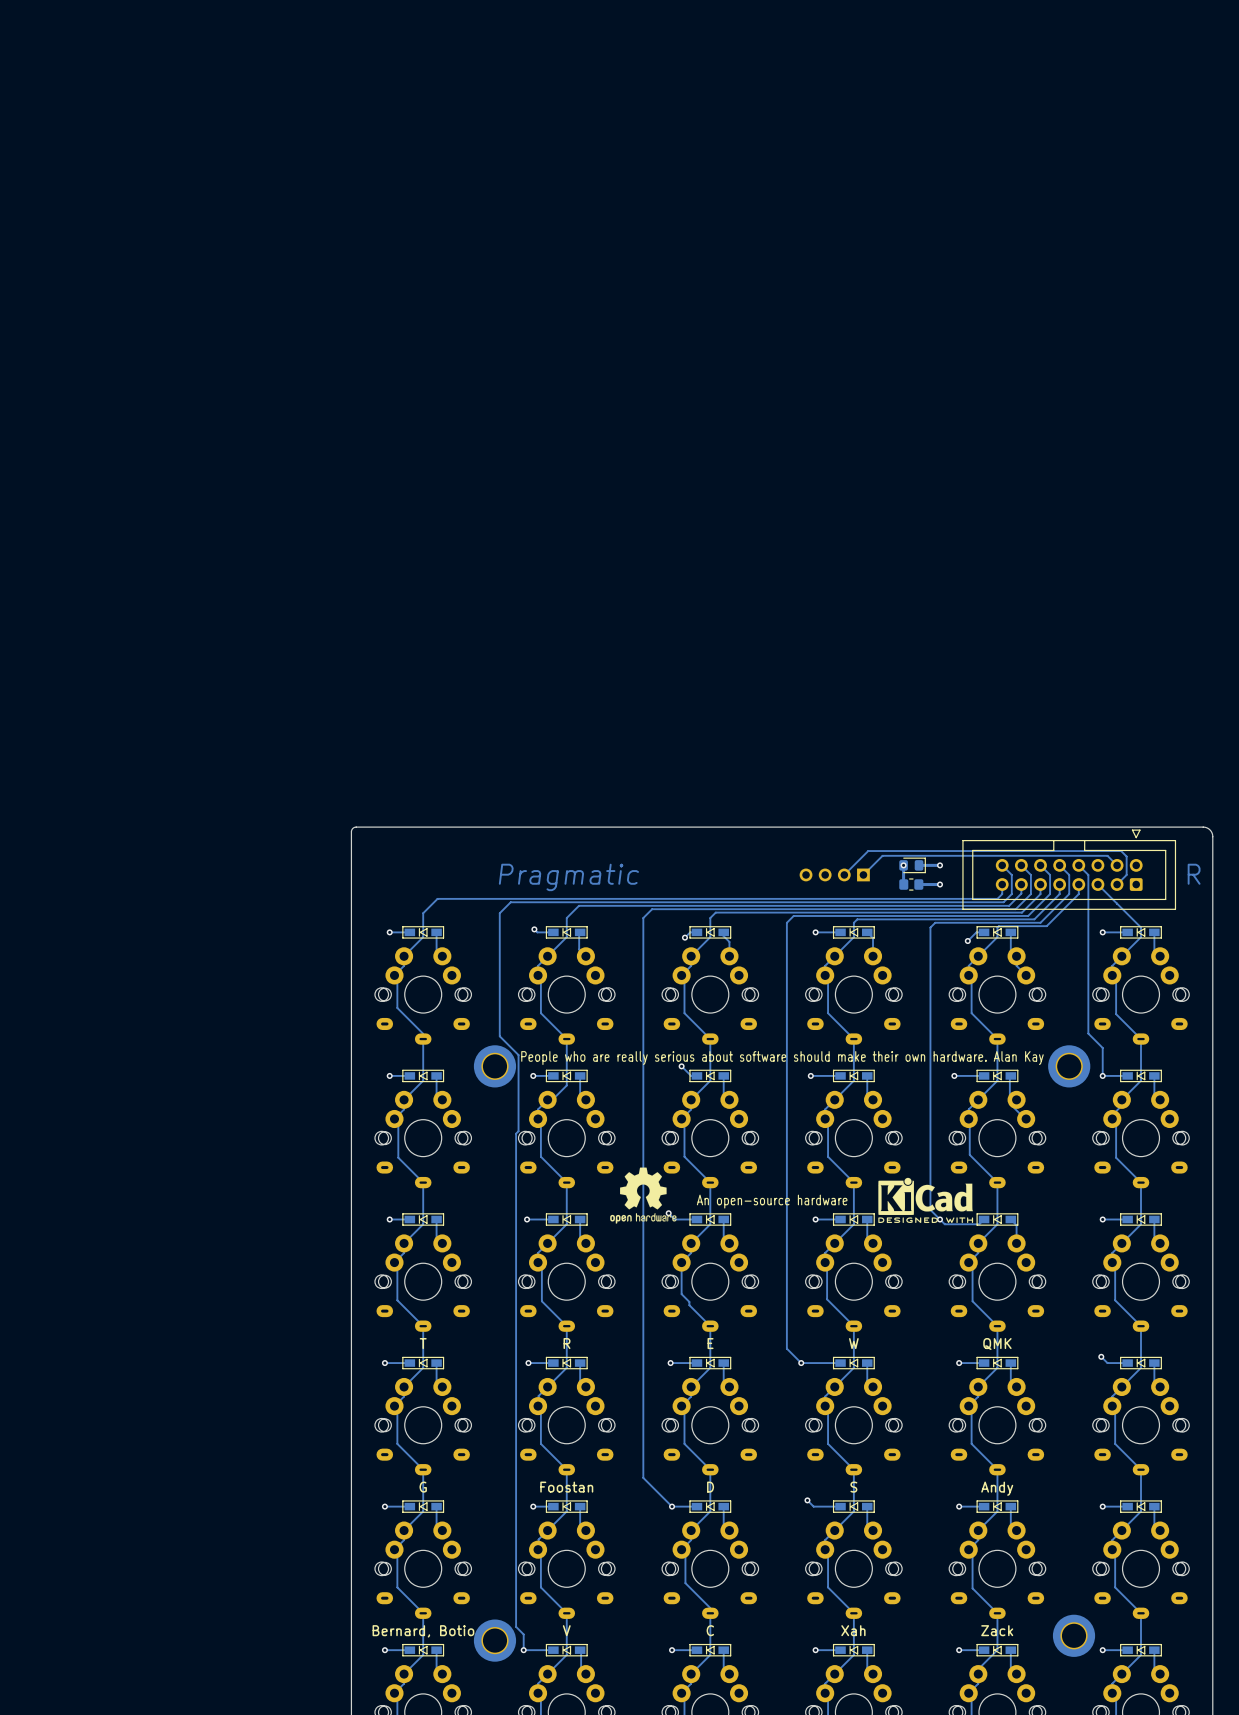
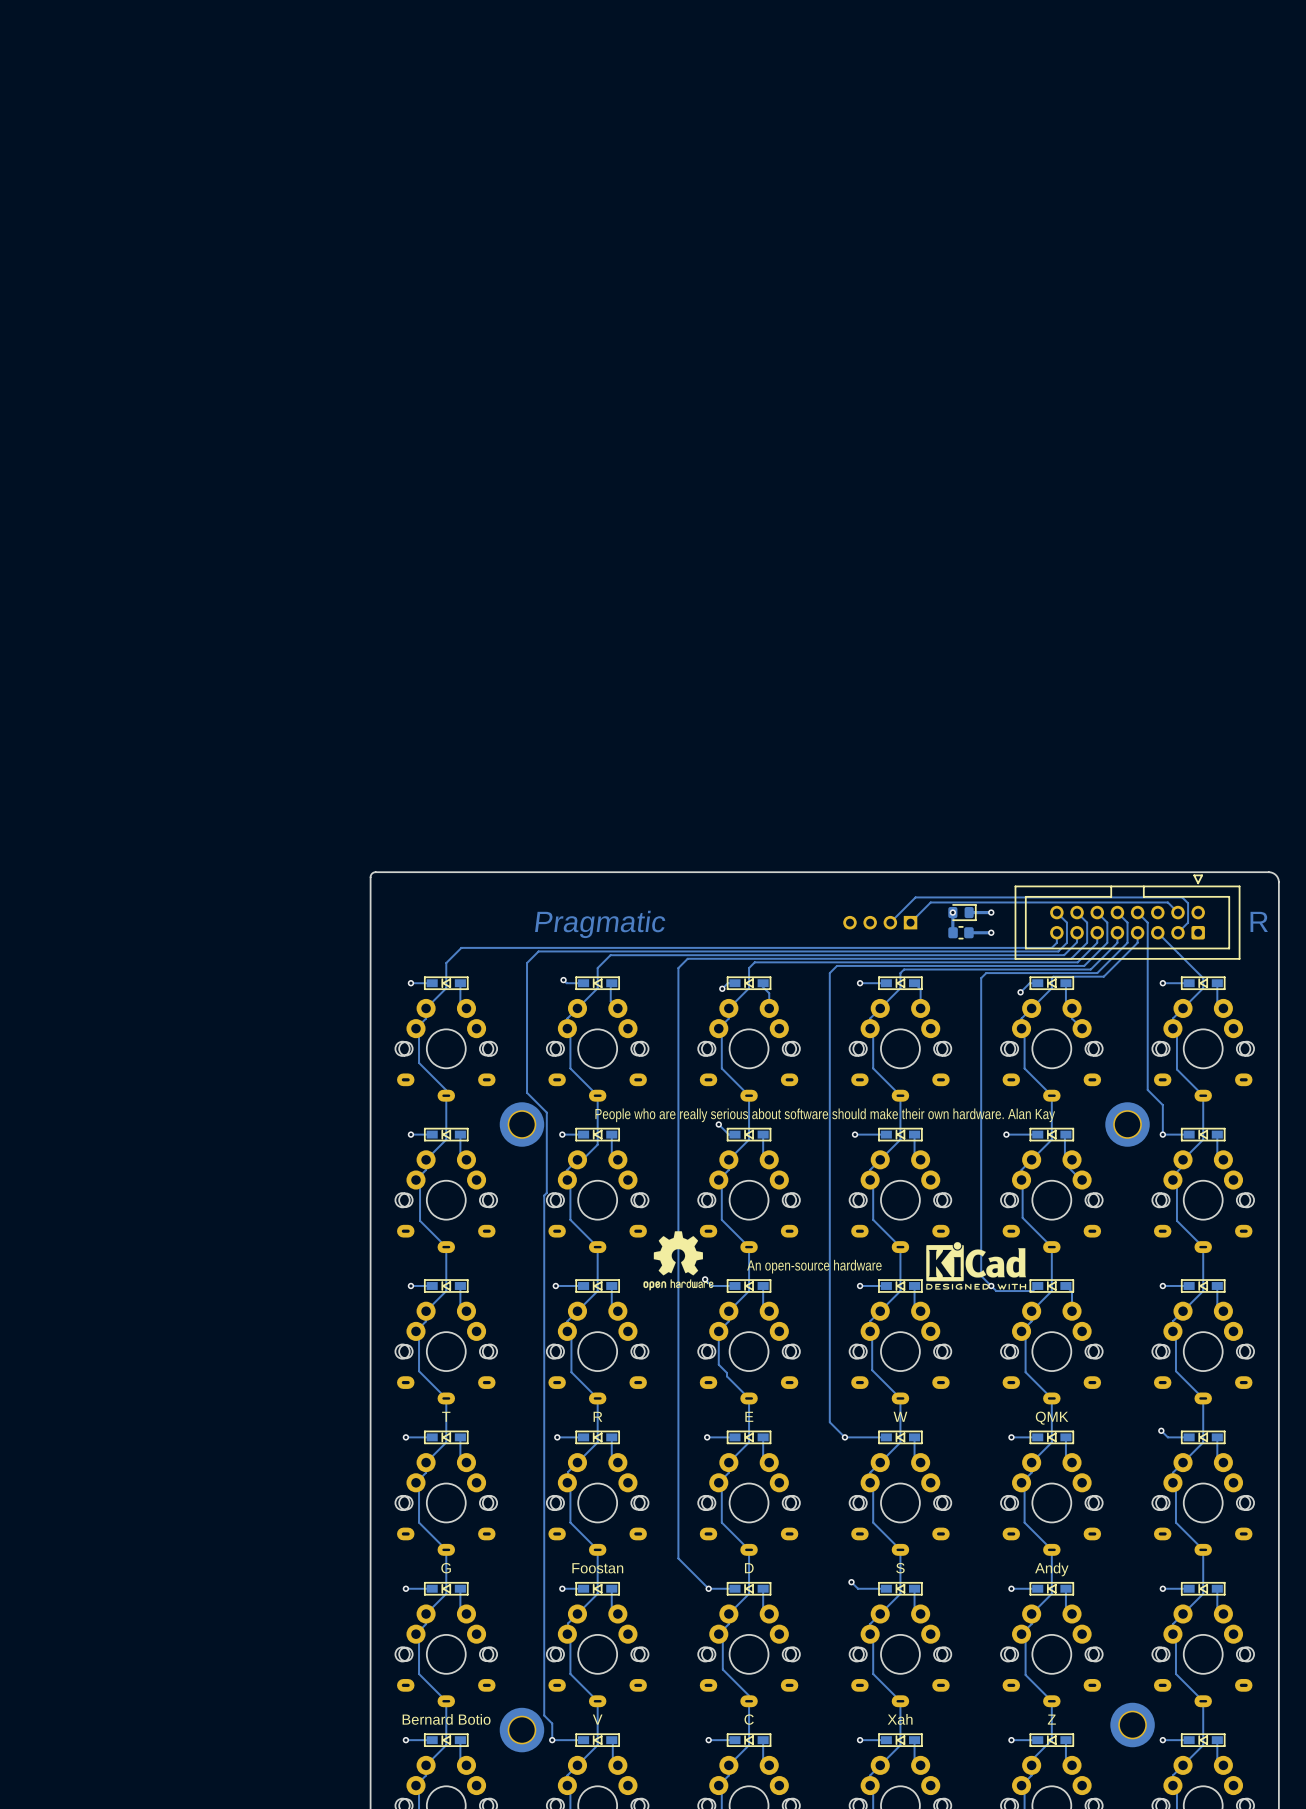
text: Zack (997, 1630) -> Z (1051, 1719)
text: Bernard, Botio (423, 1631) -> Bernard Botio (446, 1719)

